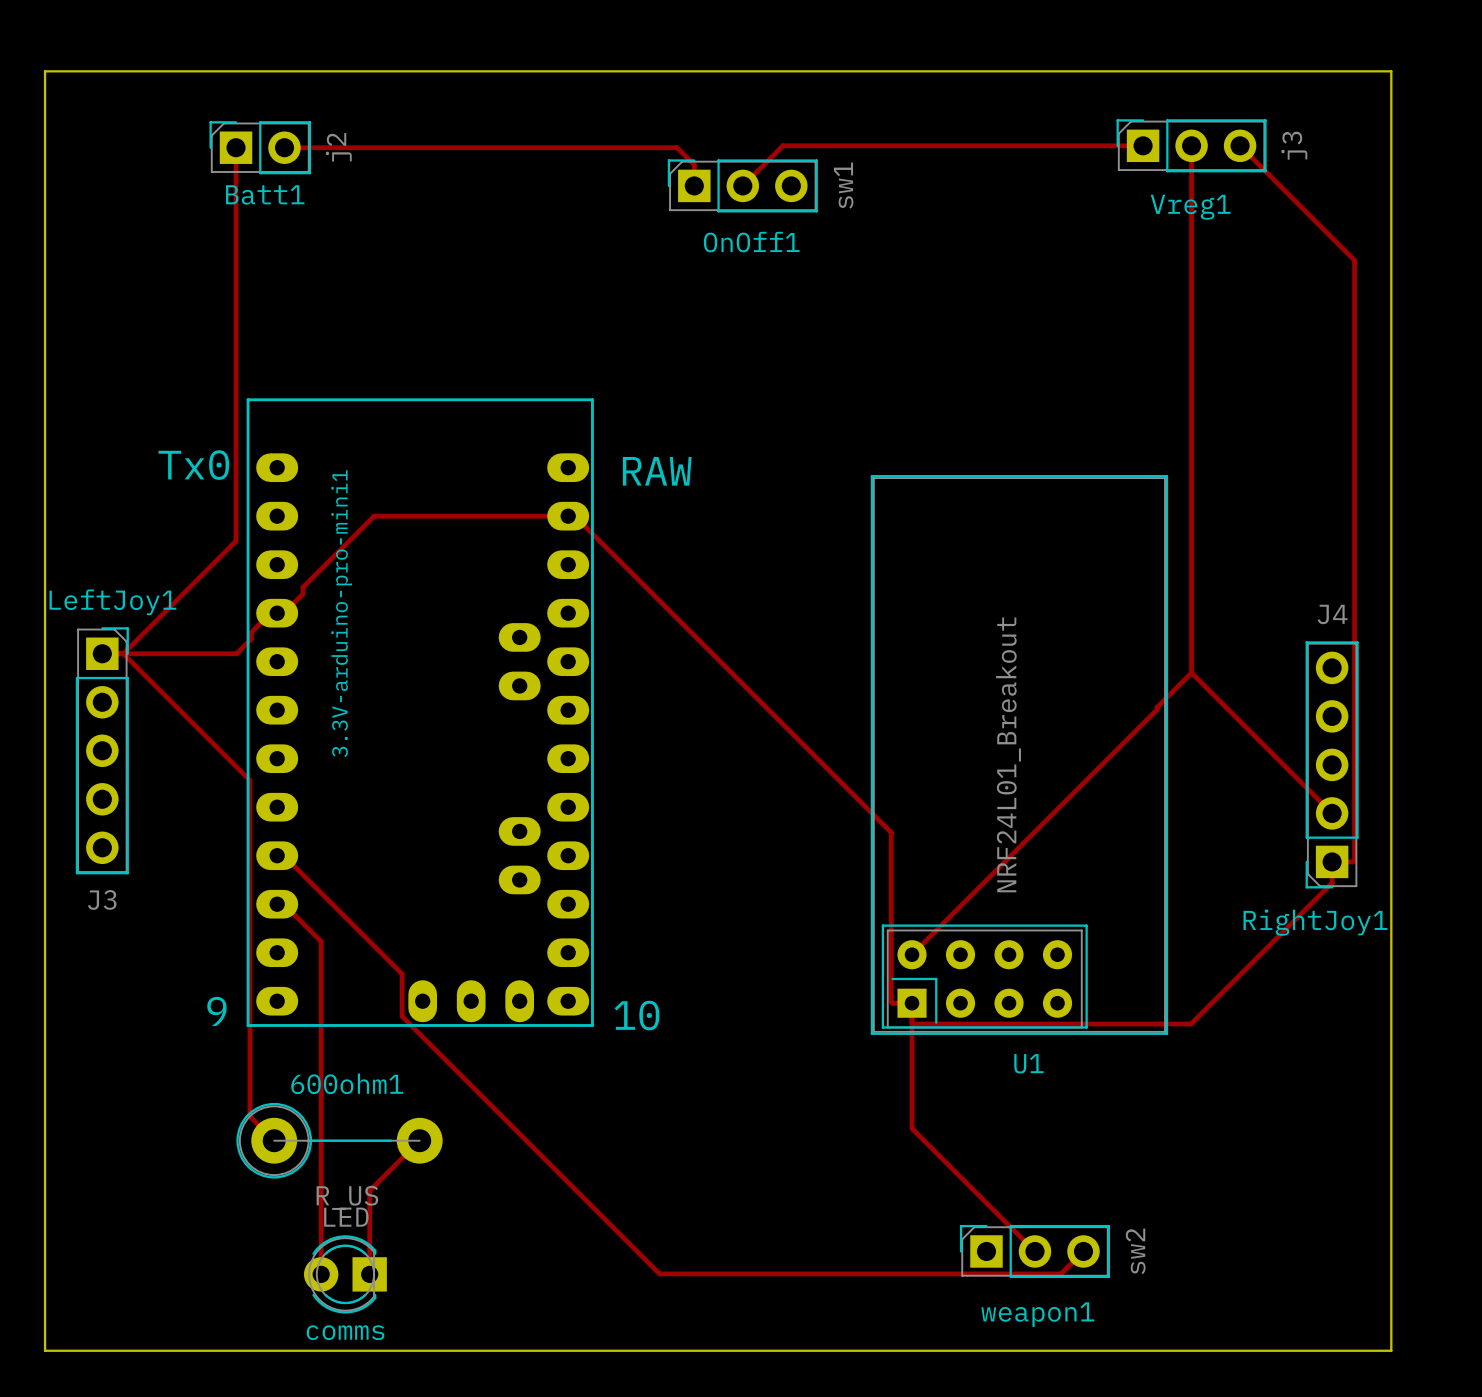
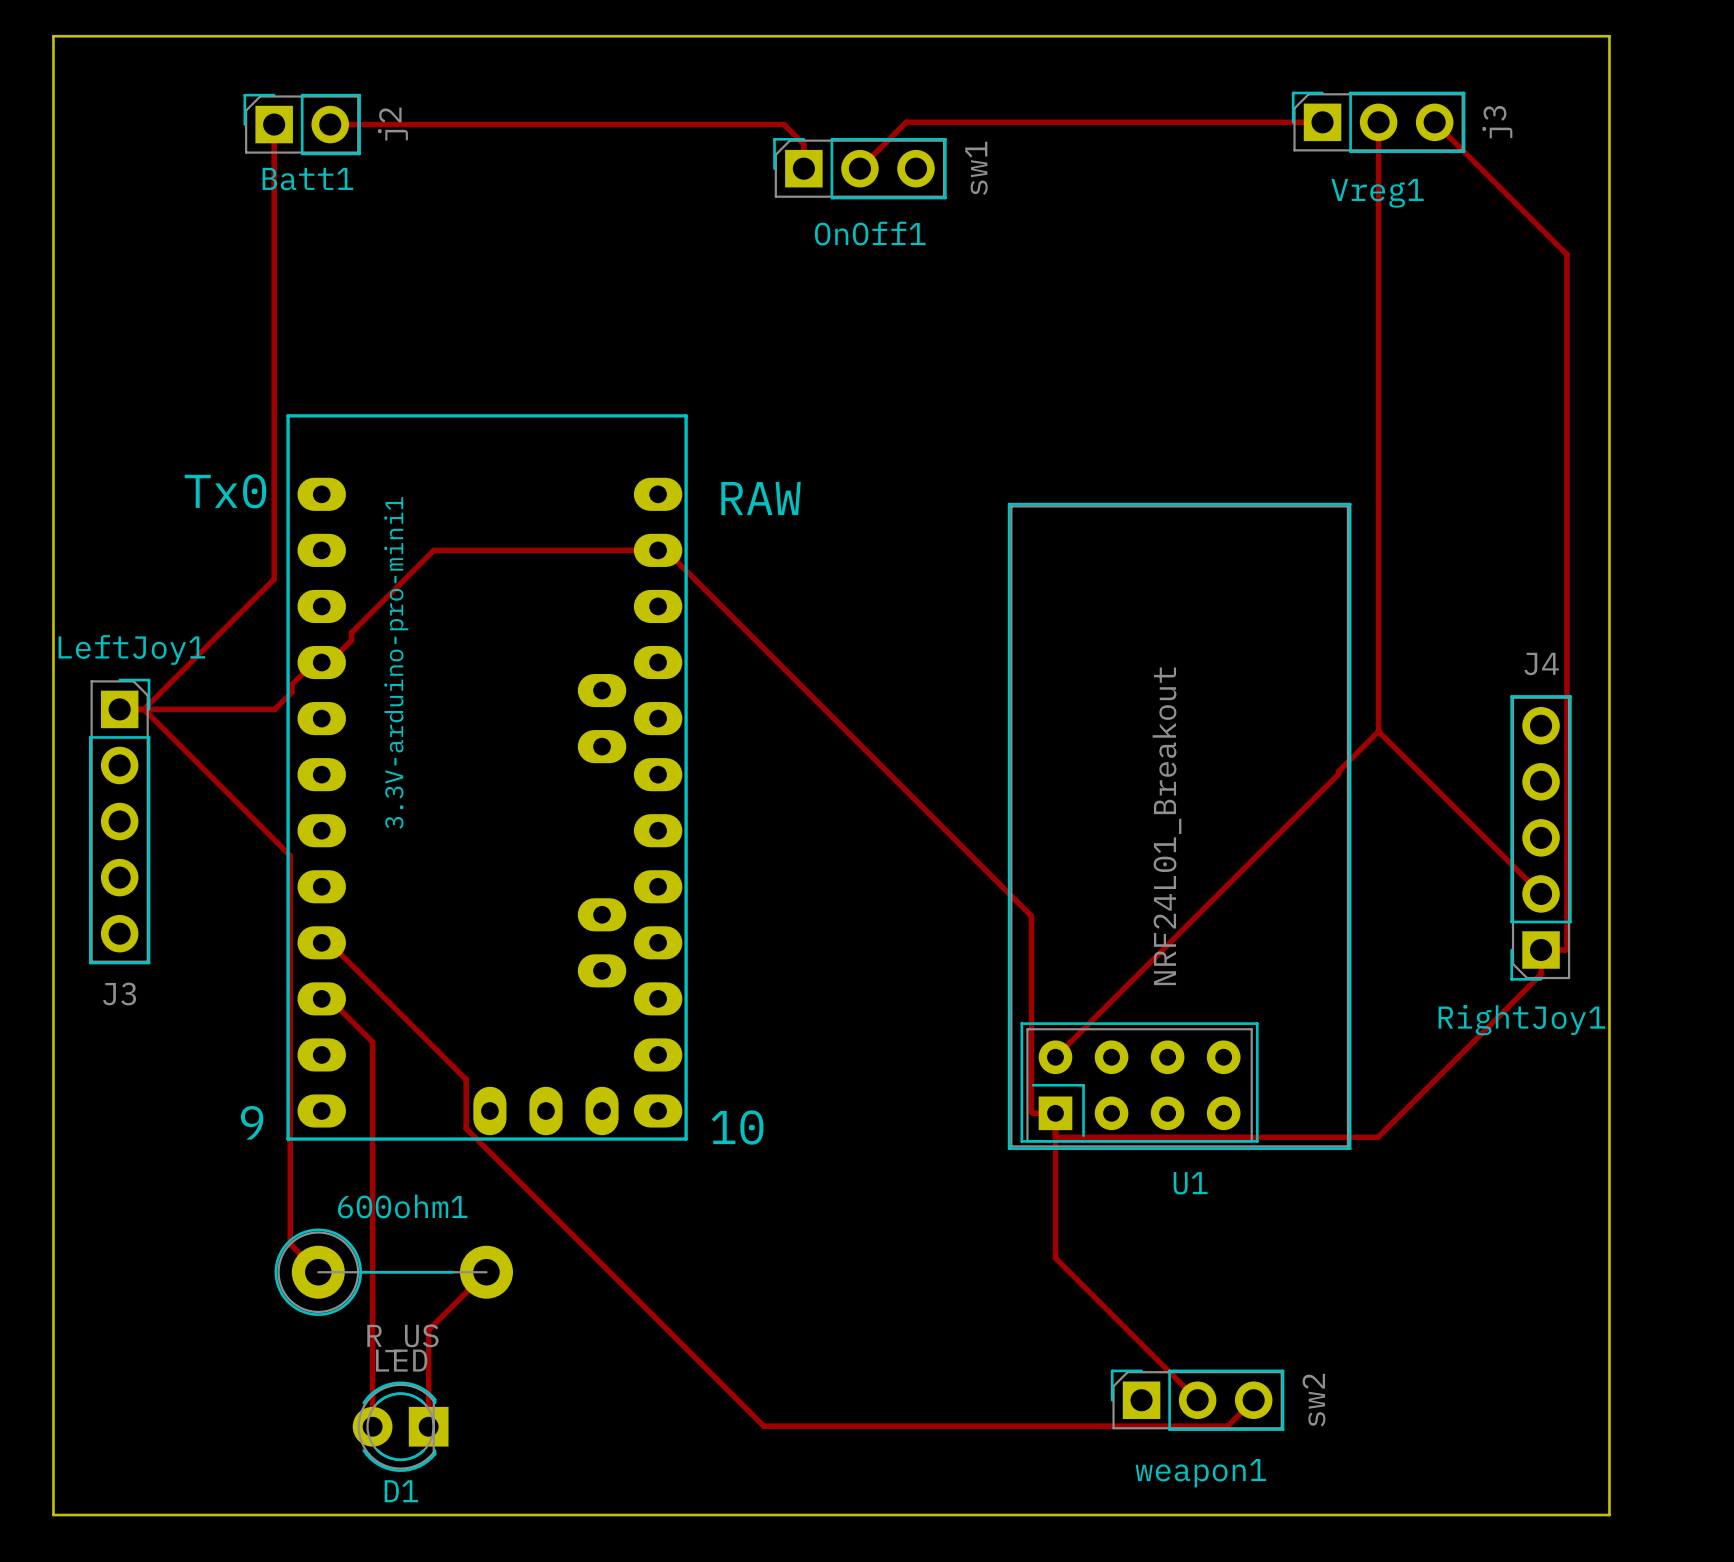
comms name: comms (345, 1332) -> D1 (401, 1491)

